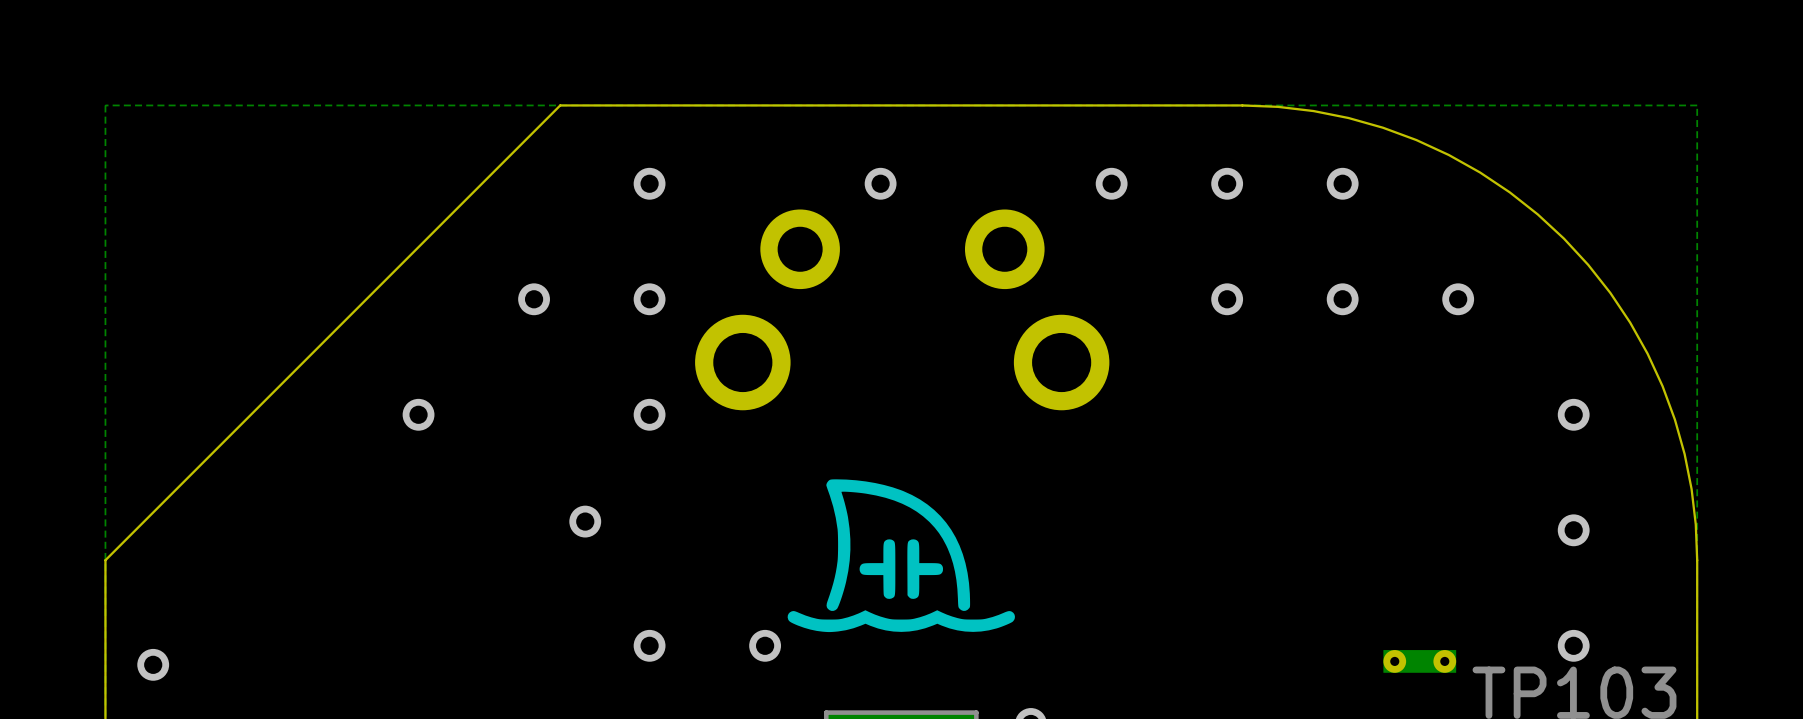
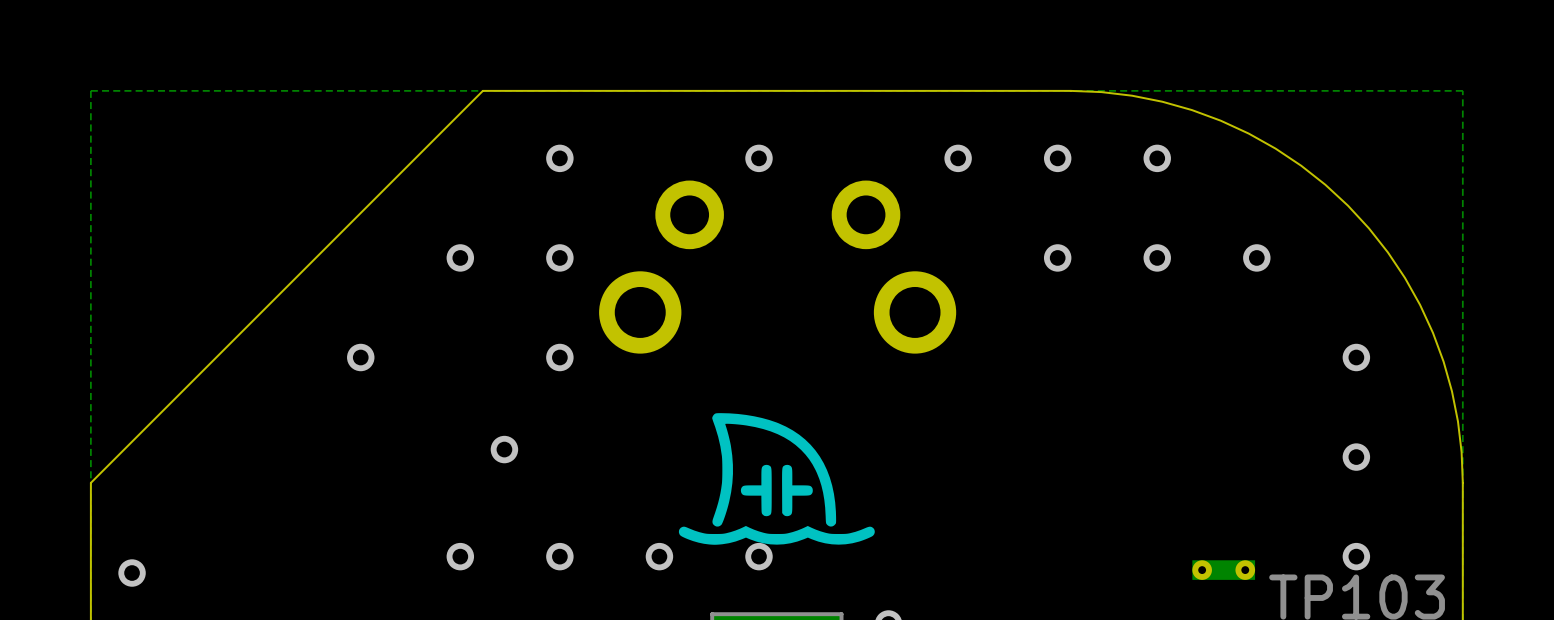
via: none -> (460, 556)
via: none -> (759, 556)

